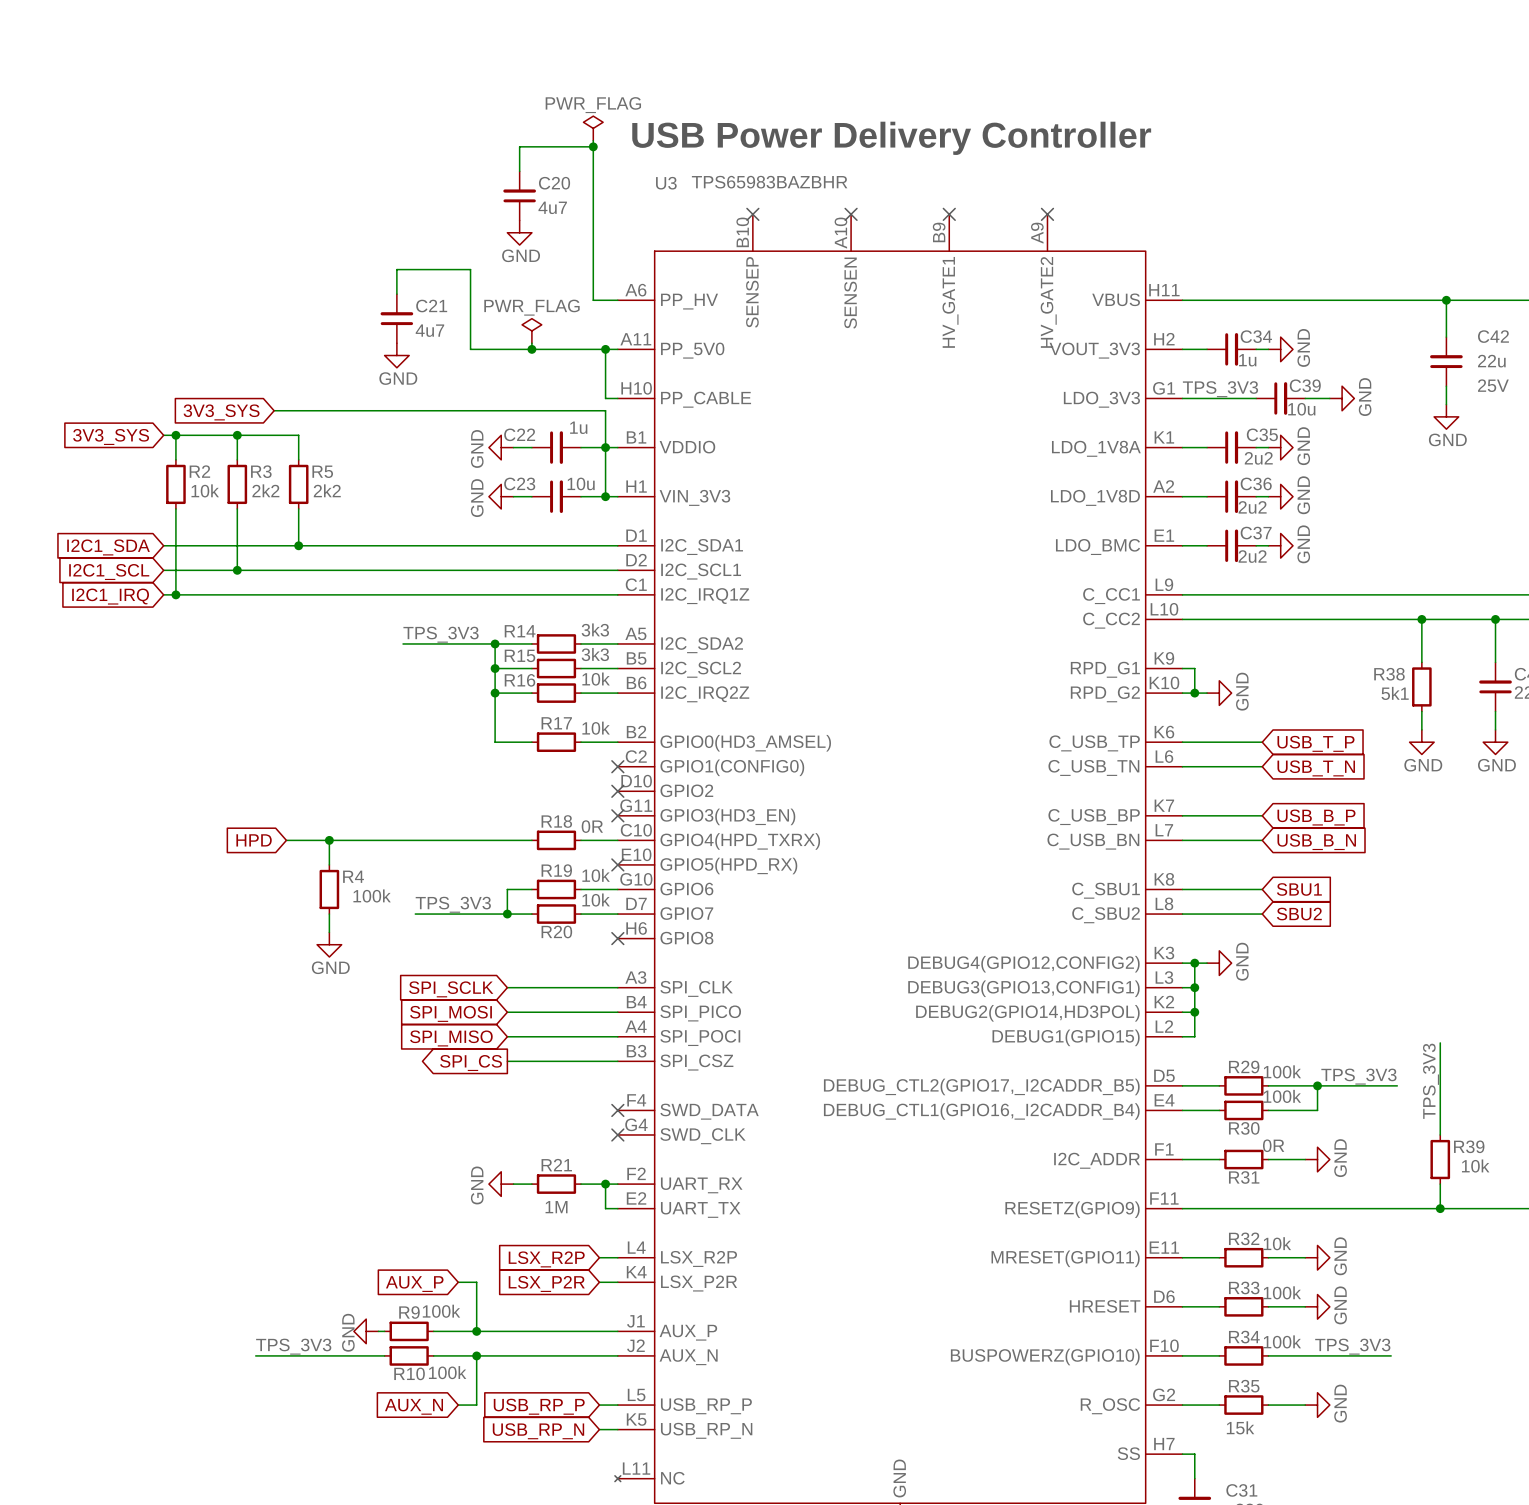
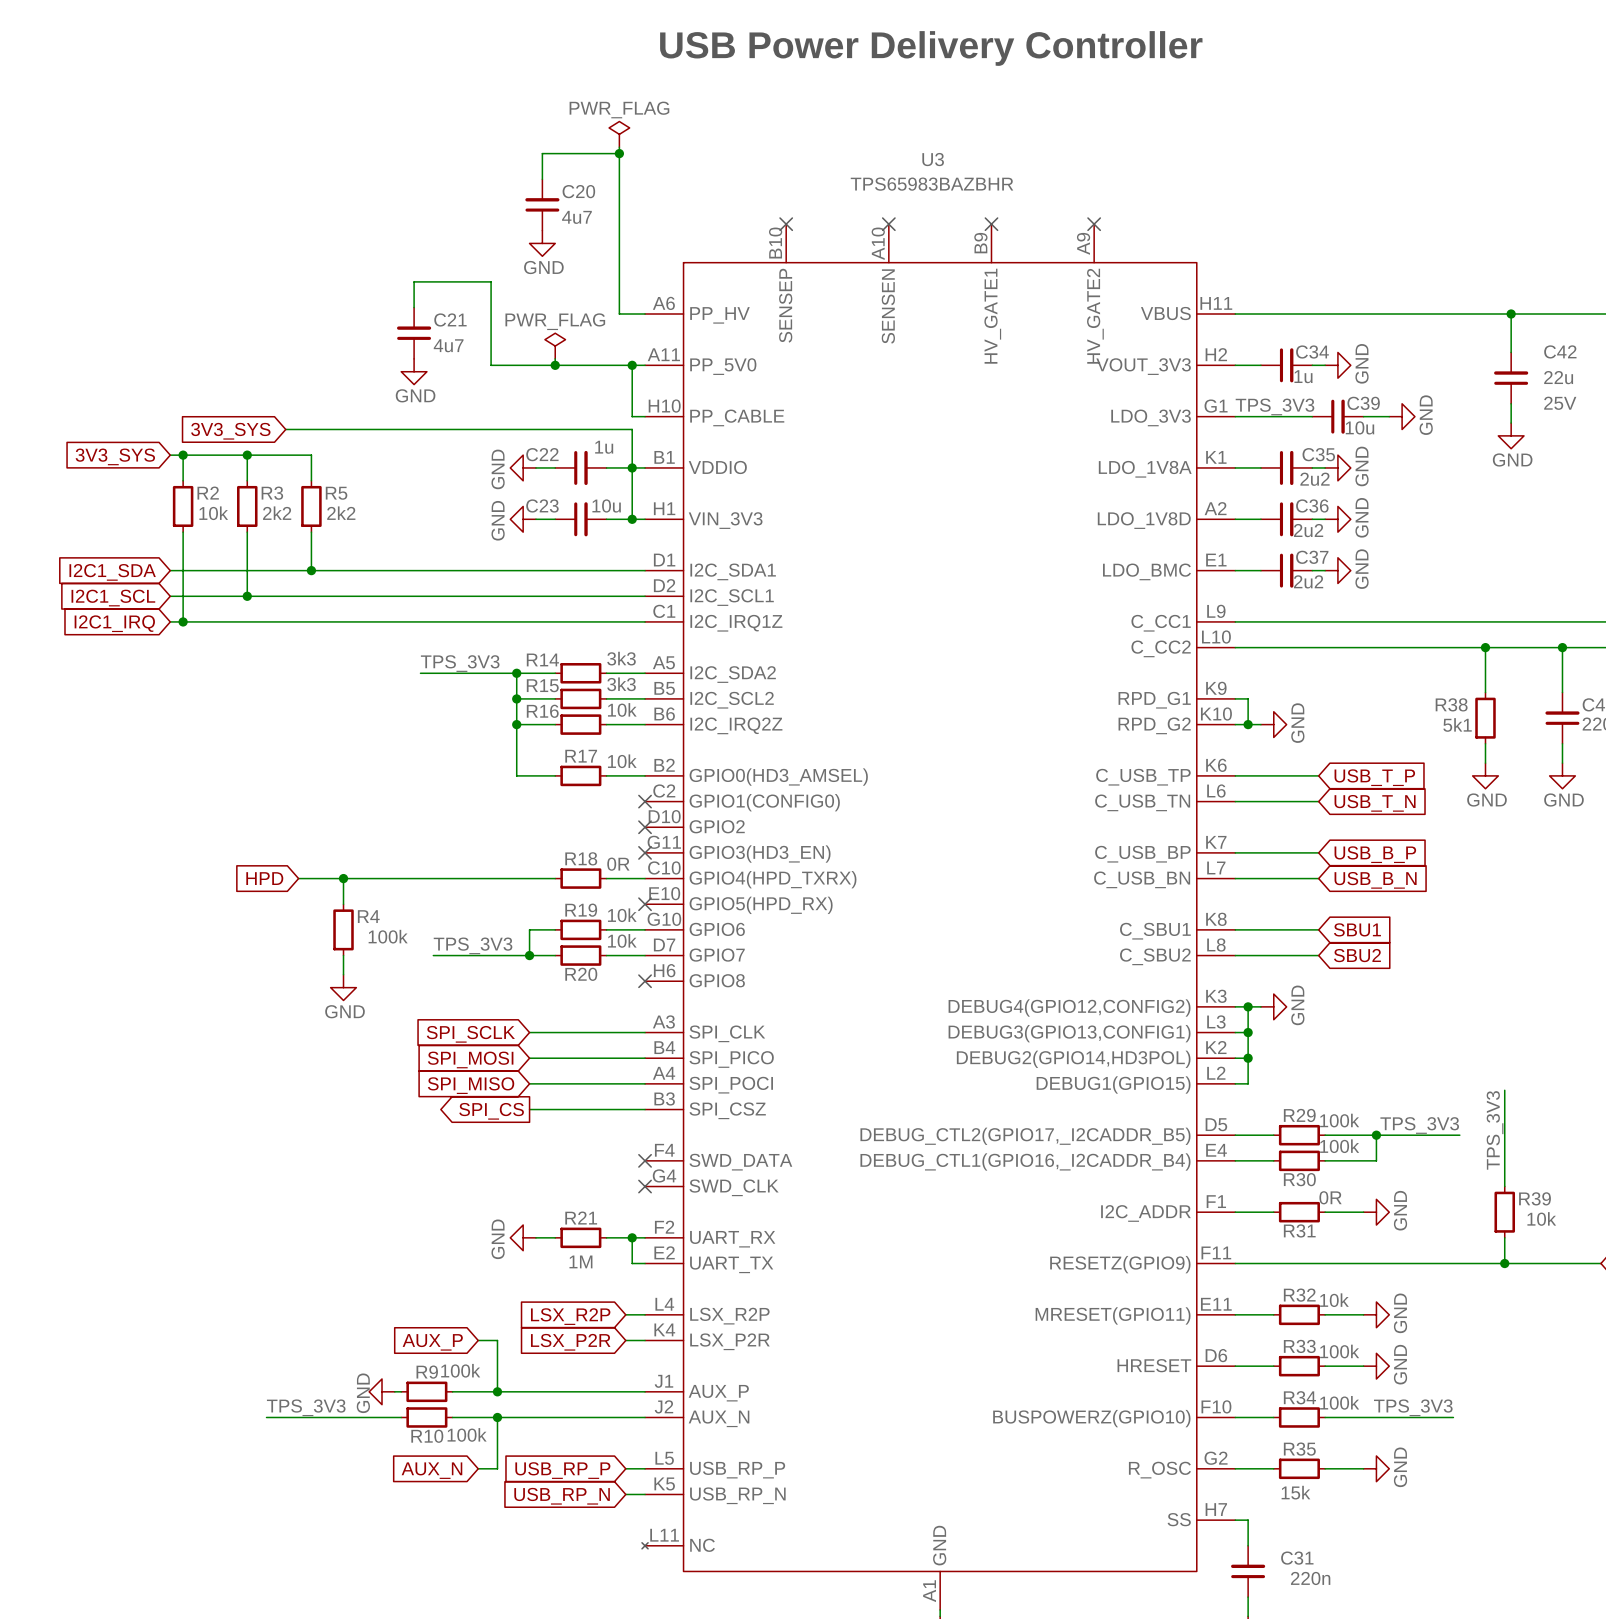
text position: USB Power Delivery Controller (891, 138) -> USB Power Delivery Controller (931, 48)
U3 text: none -> TPS65983BAZBHR (932, 184)
U3 value: TPS65983BAZBHR (769, 182) -> none
U3 name position: U3 (666, 183) -> U3 (933, 159)

